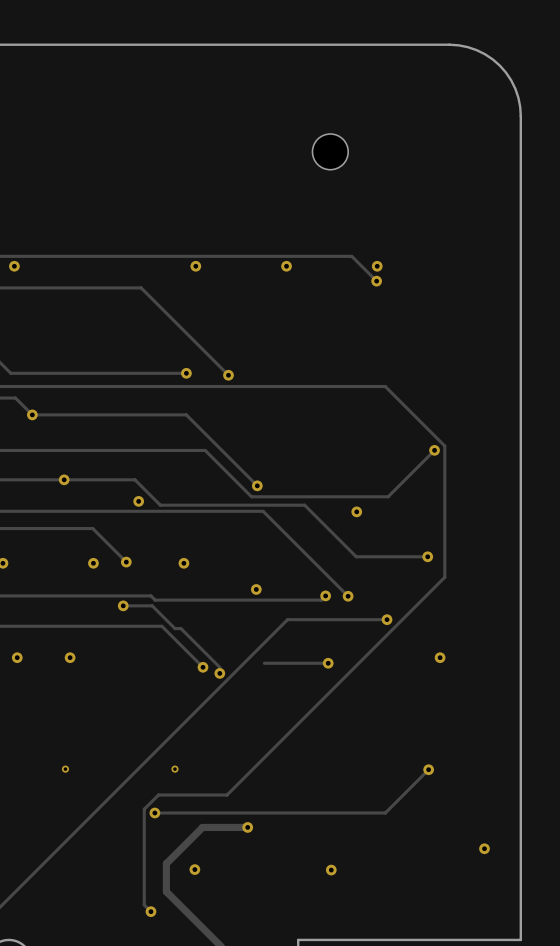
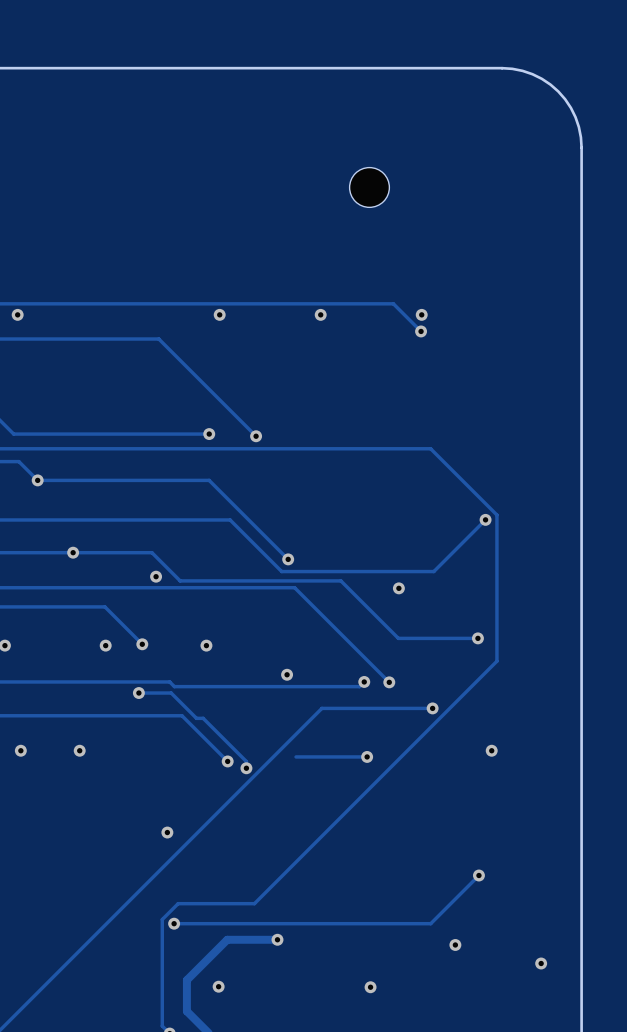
via: none -> (167, 832)
via: (65, 769) -> none
via: (174, 769) -> none
via: none -> (455, 944)

